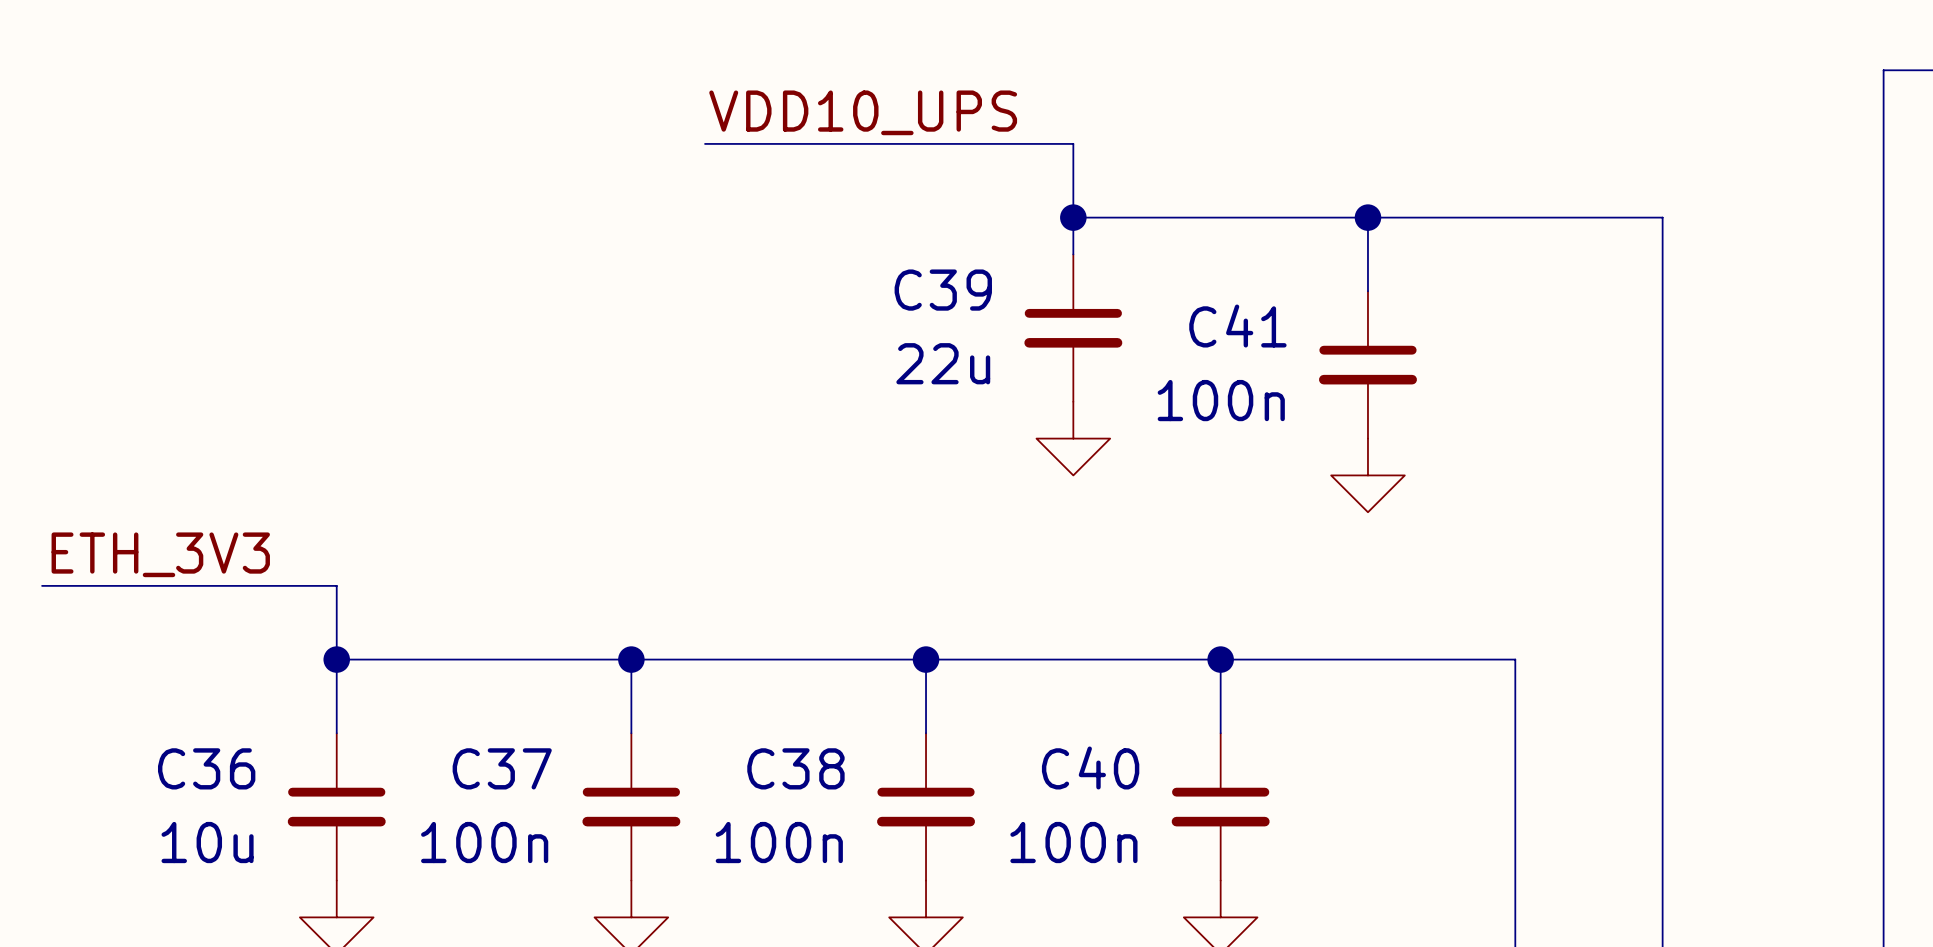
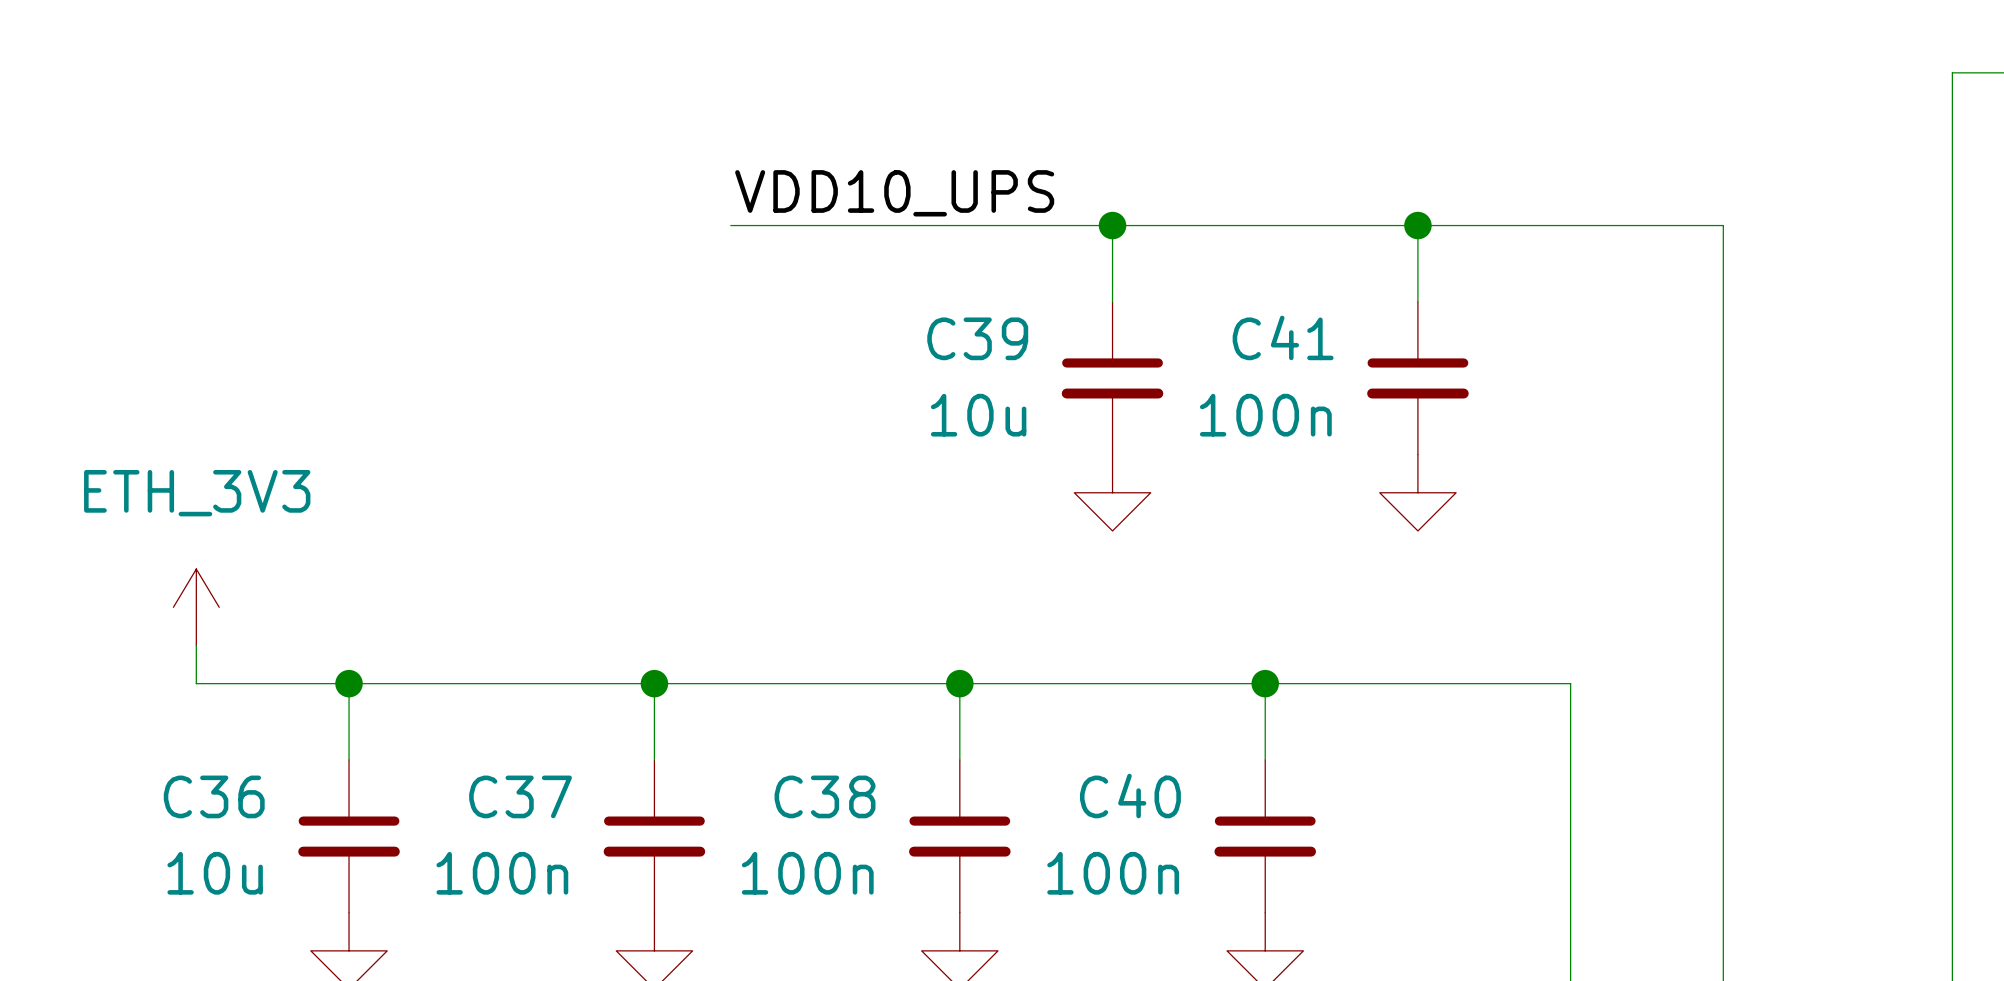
label position: VDD10_UPS (863, 112) -> VDD10_UPS (894, 193)
wire: (705, 143) (1073, 143) (1073, 217) -> (730, 225) (1112, 225)
C39 position: (1073, 328) -> (1112, 378)
C39 value: 22u (943, 363) -> 10u (978, 415)
power symbol position: (1073, 438) -> (1112, 492)
label: ETH_3V3 (160, 554) -> none
wire: (42, 585) (336, 585) (336, 659) -> (196, 645) (196, 683) (349, 683)
power symbol: none -> ETH_3V3 (196, 607)

